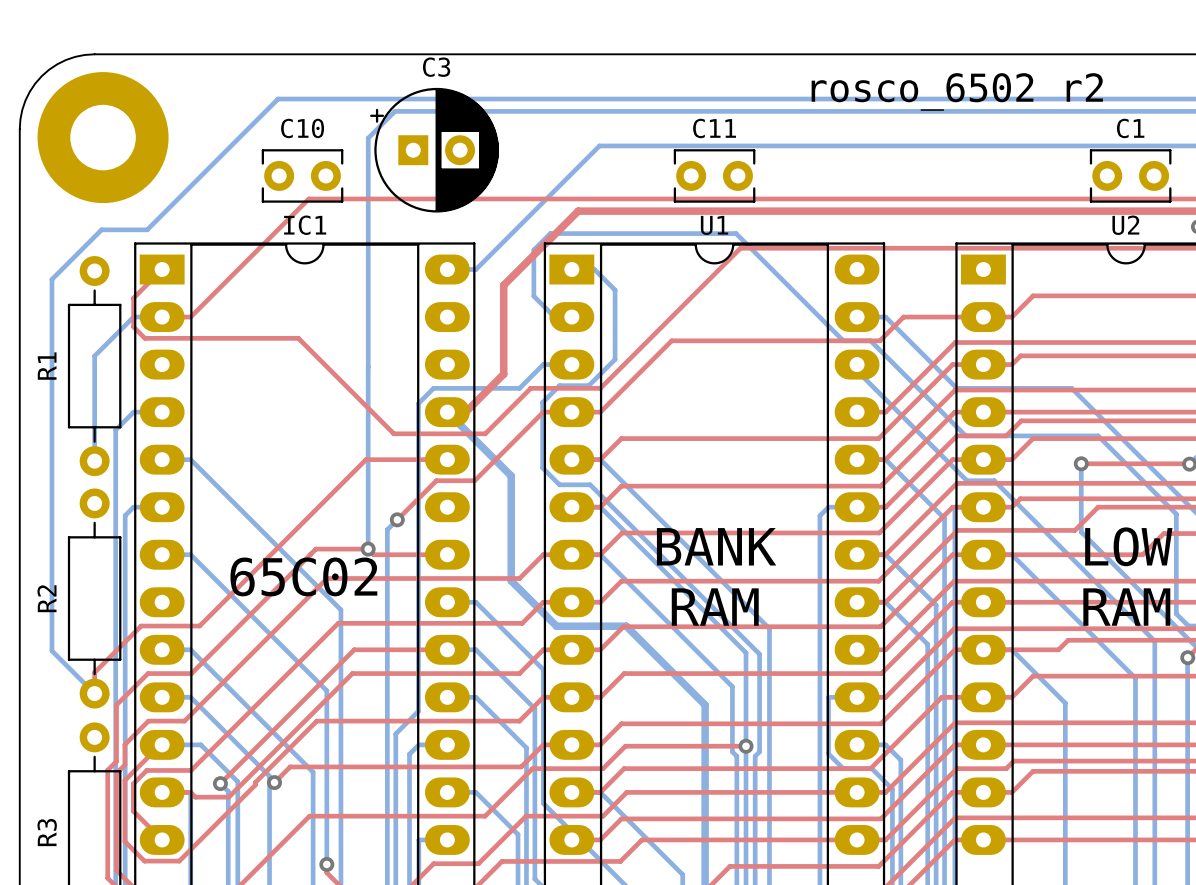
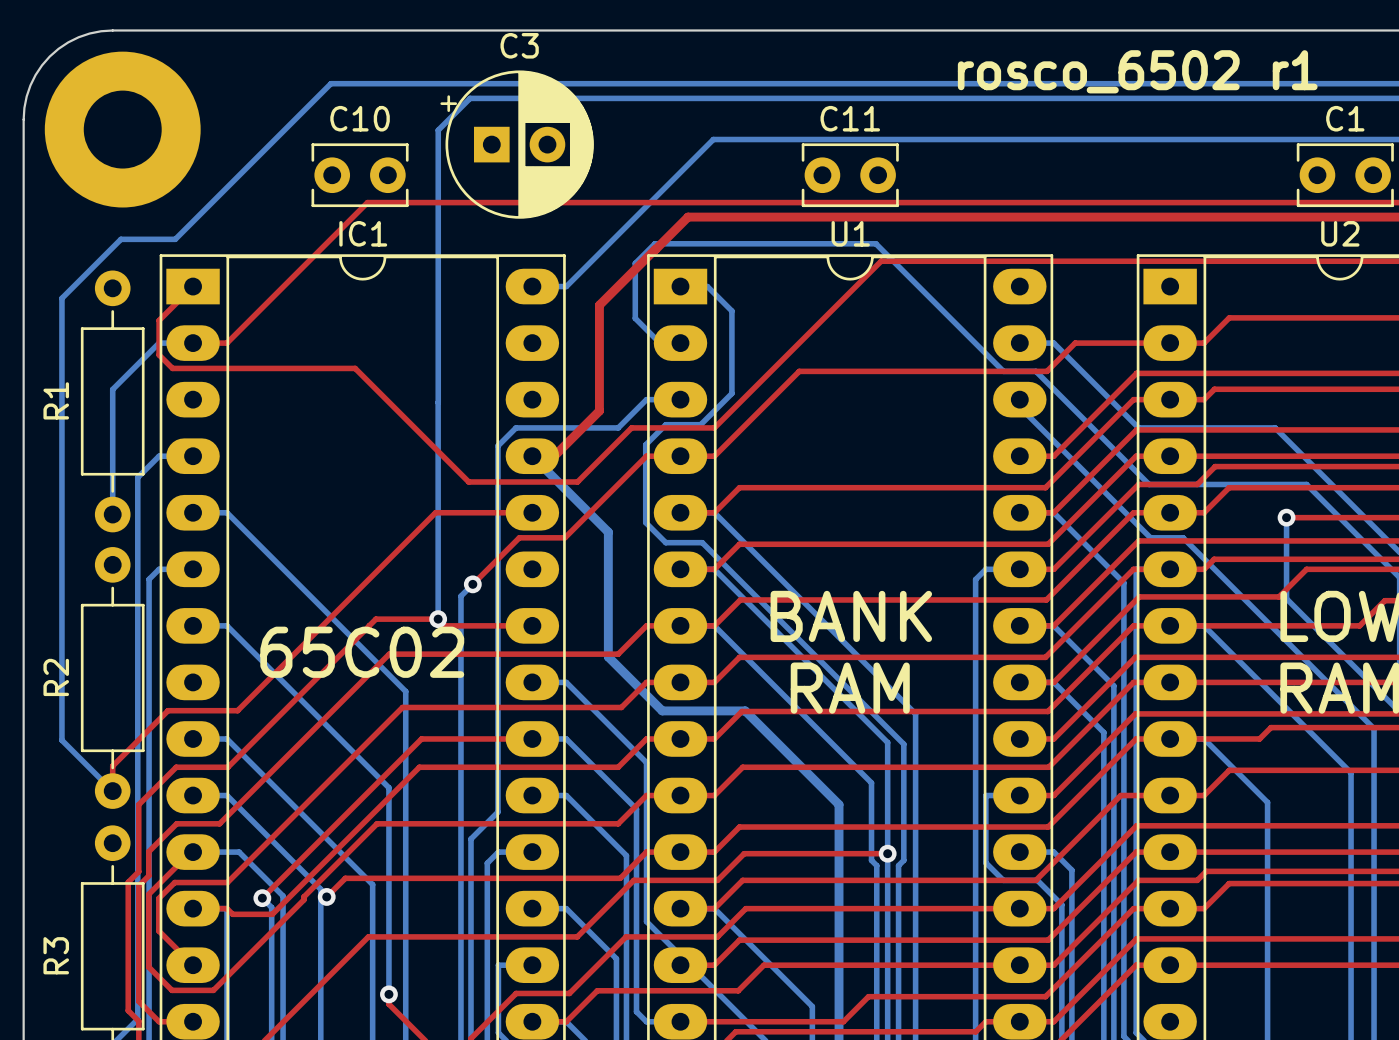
text: rosco_6502 r2 (957, 91) -> rosco_6502 r1 (1137, 71)

